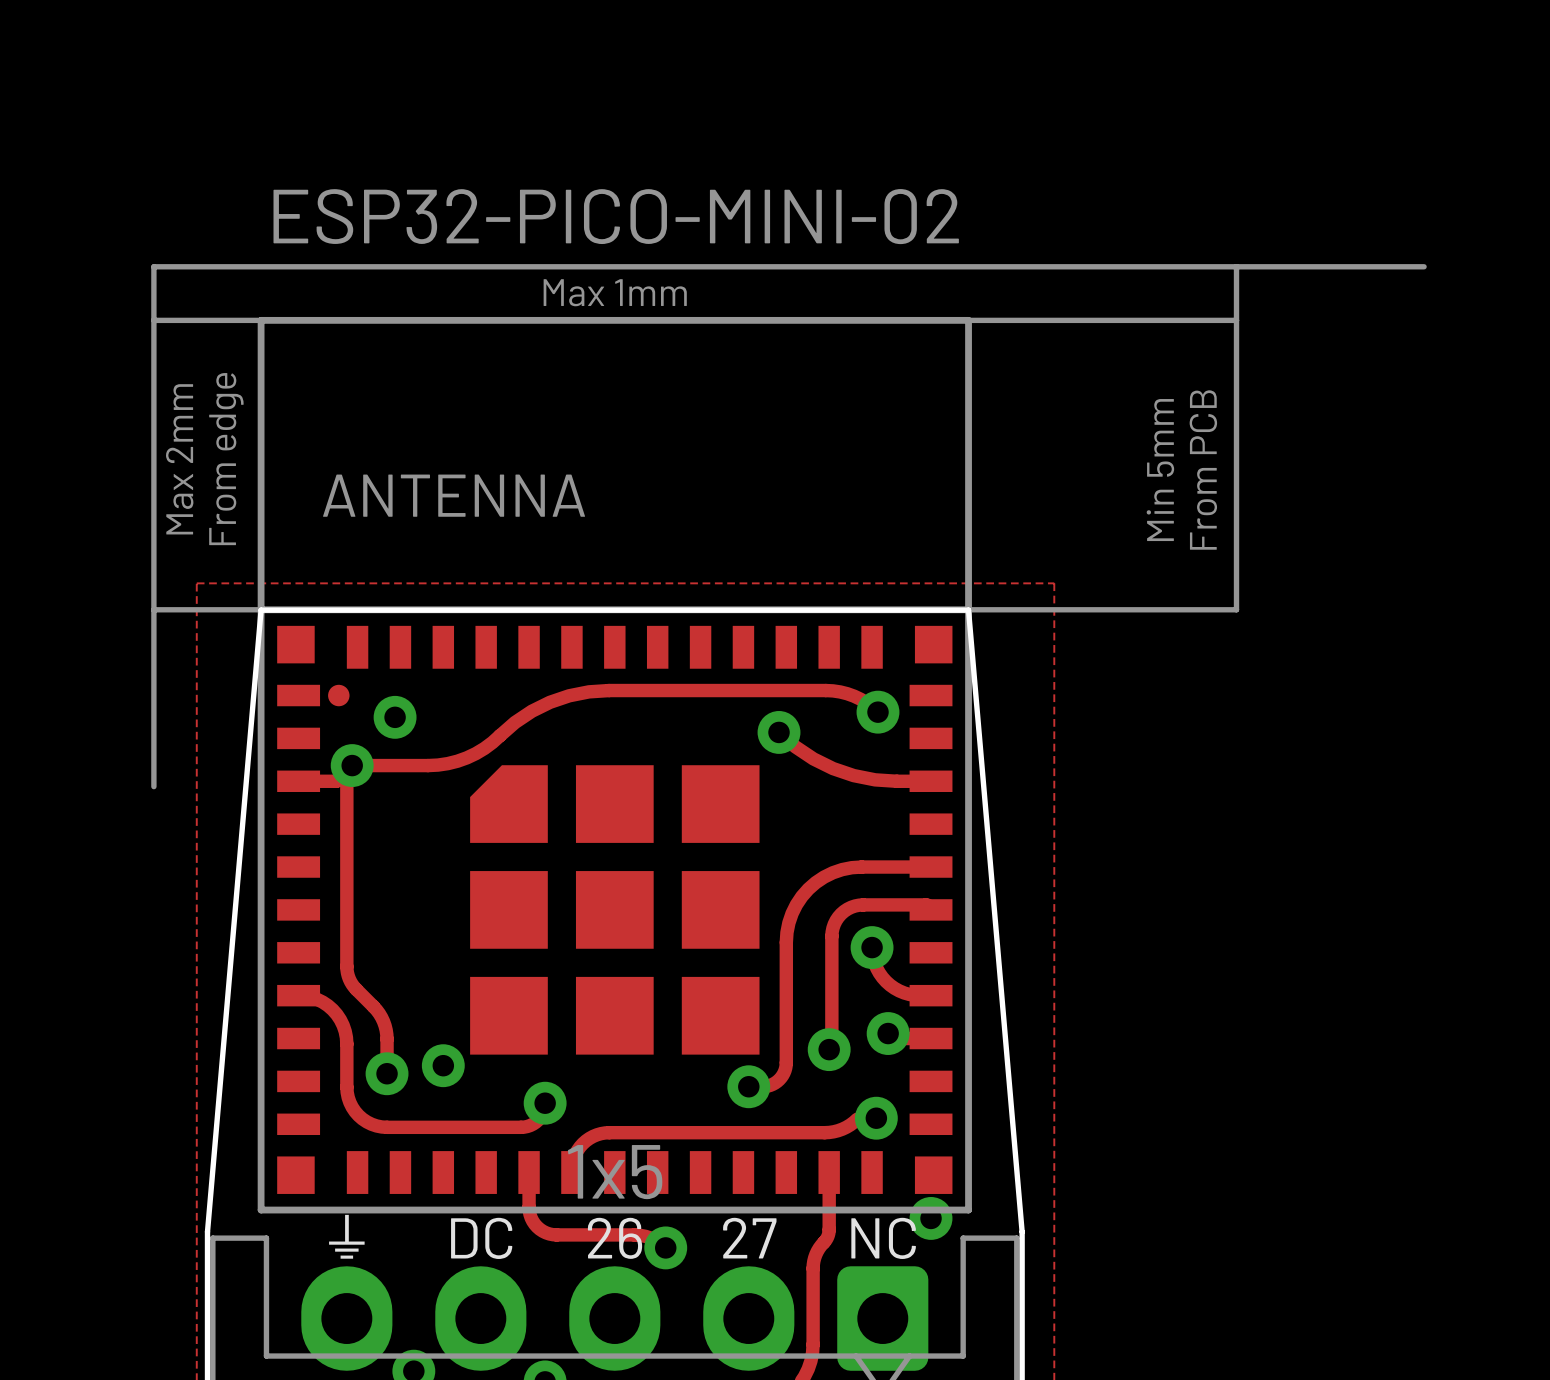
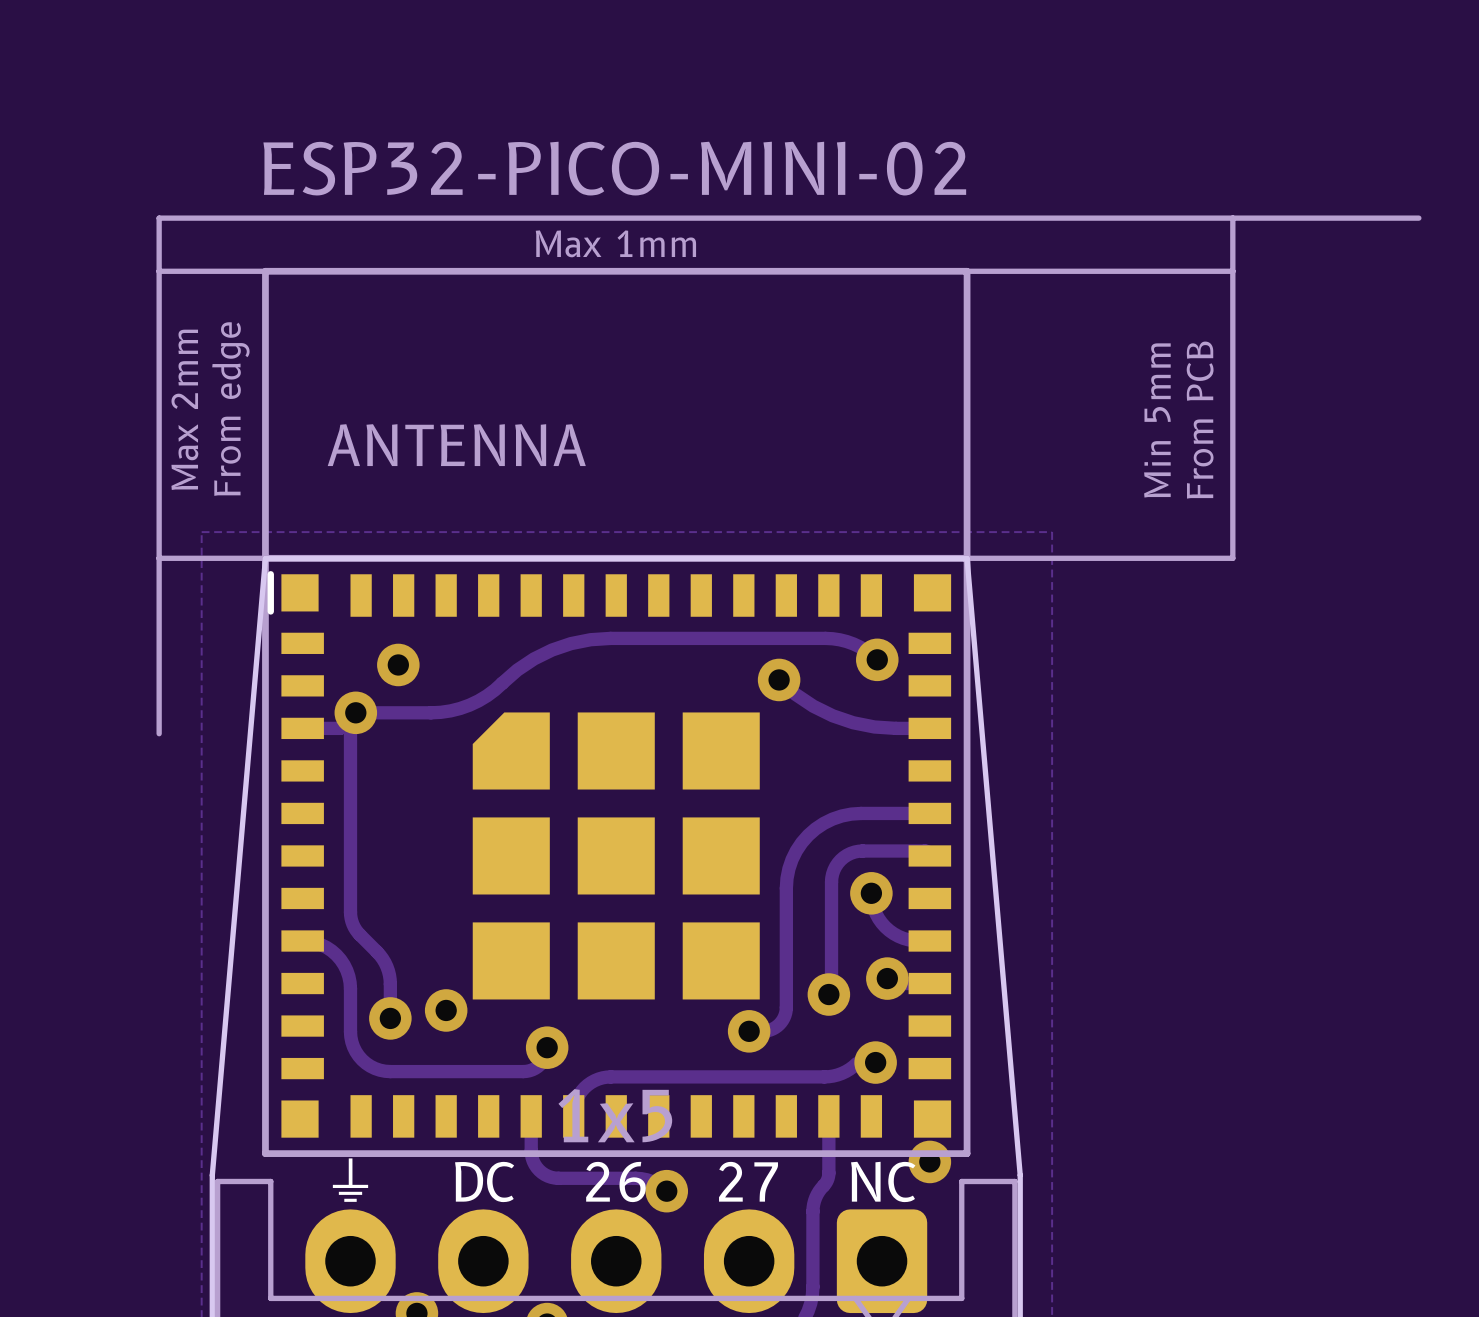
part footprint: [151, 264, 1427, 1214] -> [156, 215, 1422, 1157]

